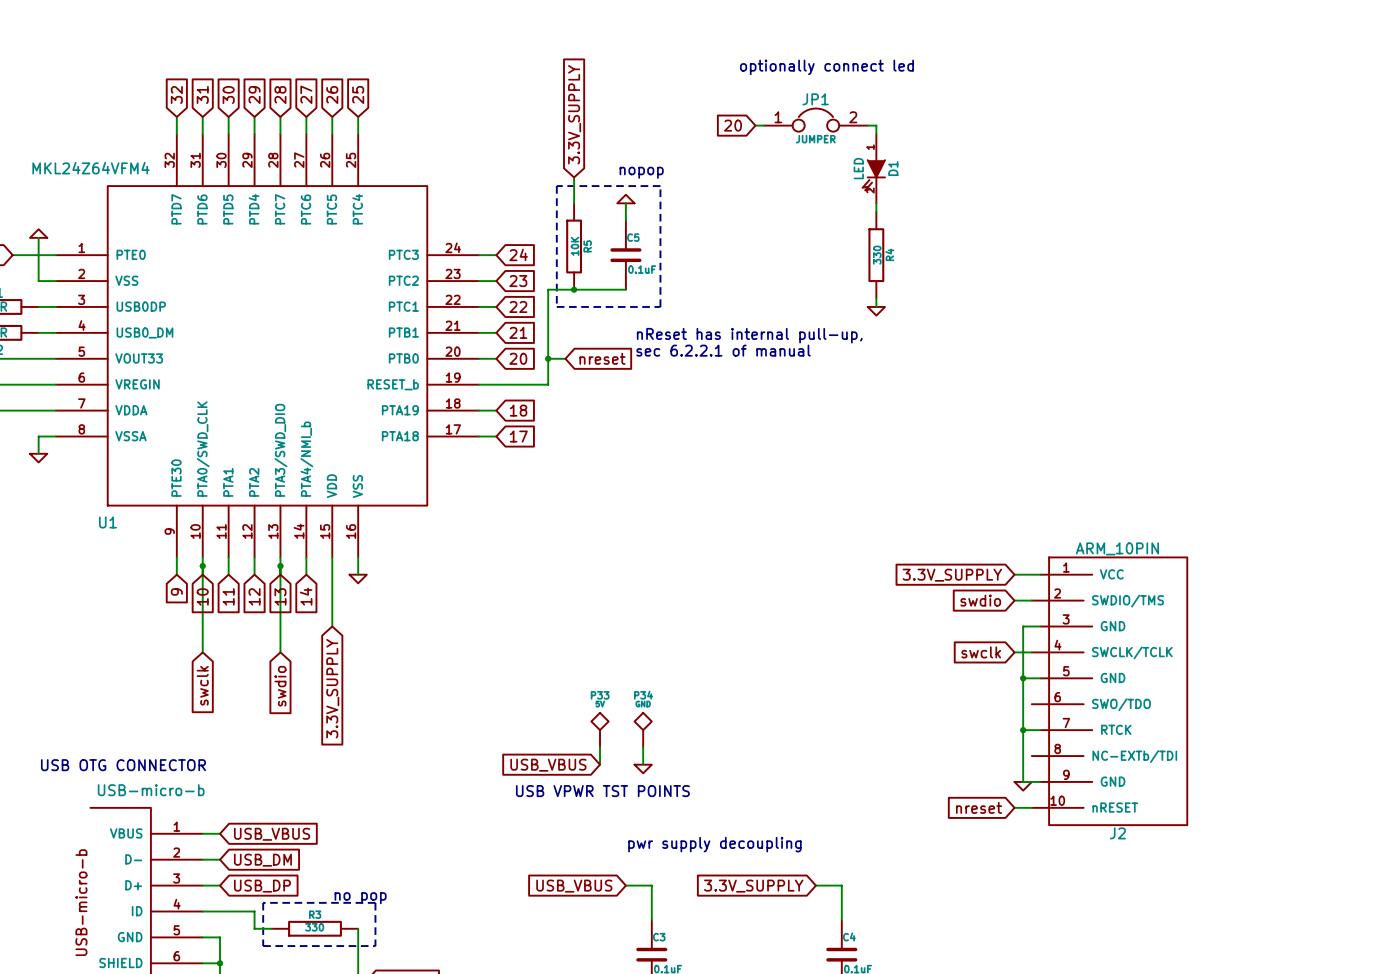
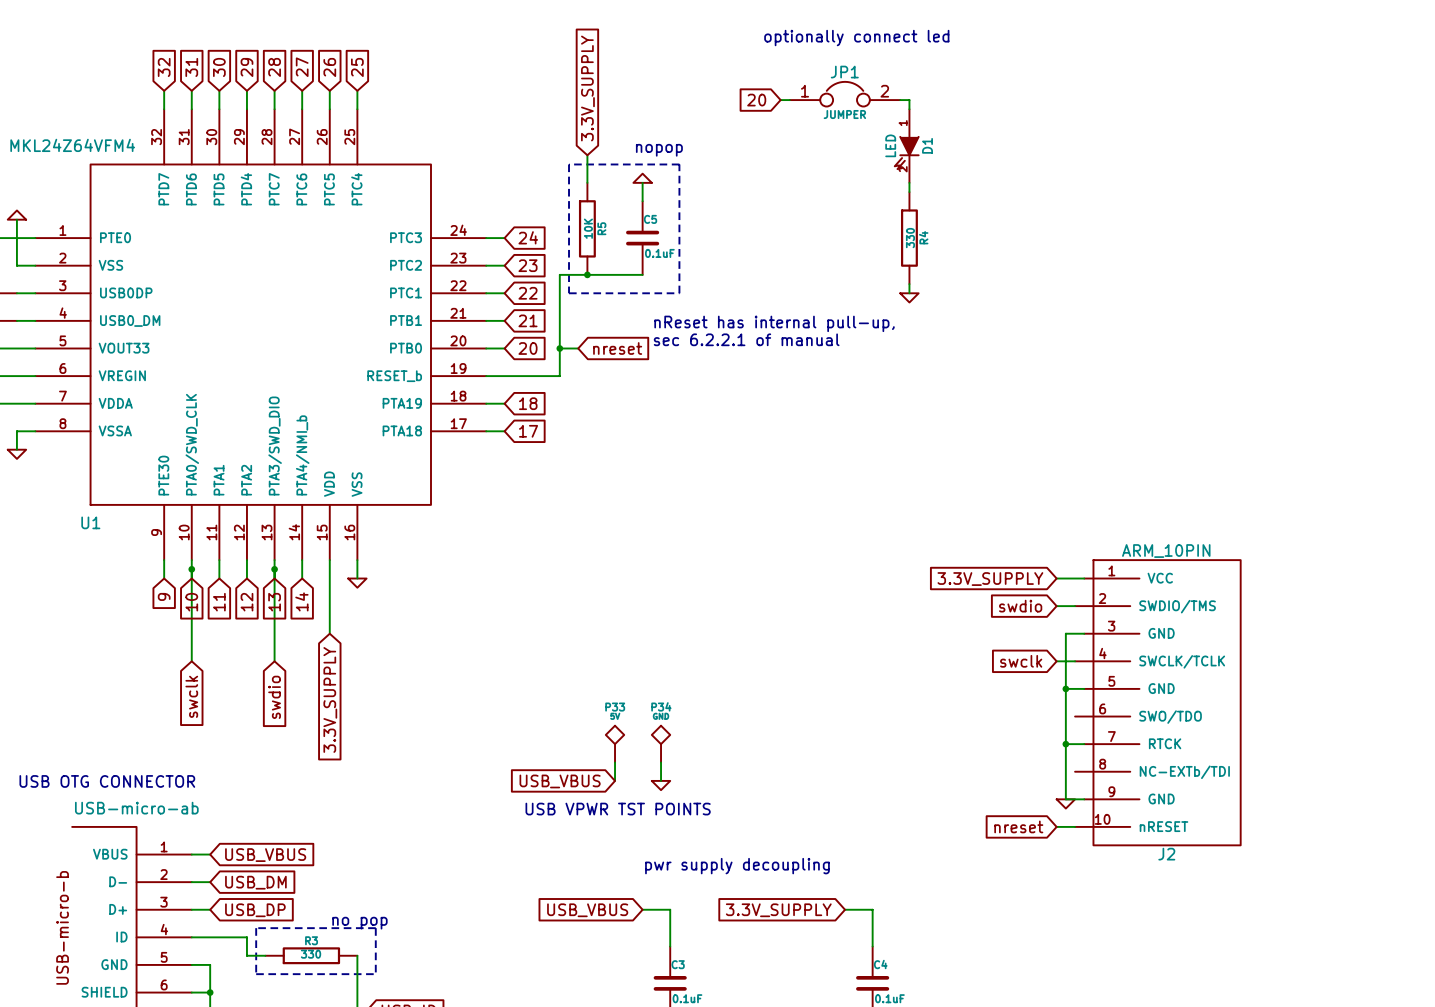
part value: USB-micro-b (151, 790) -> USB-micro-ab (136, 808)

